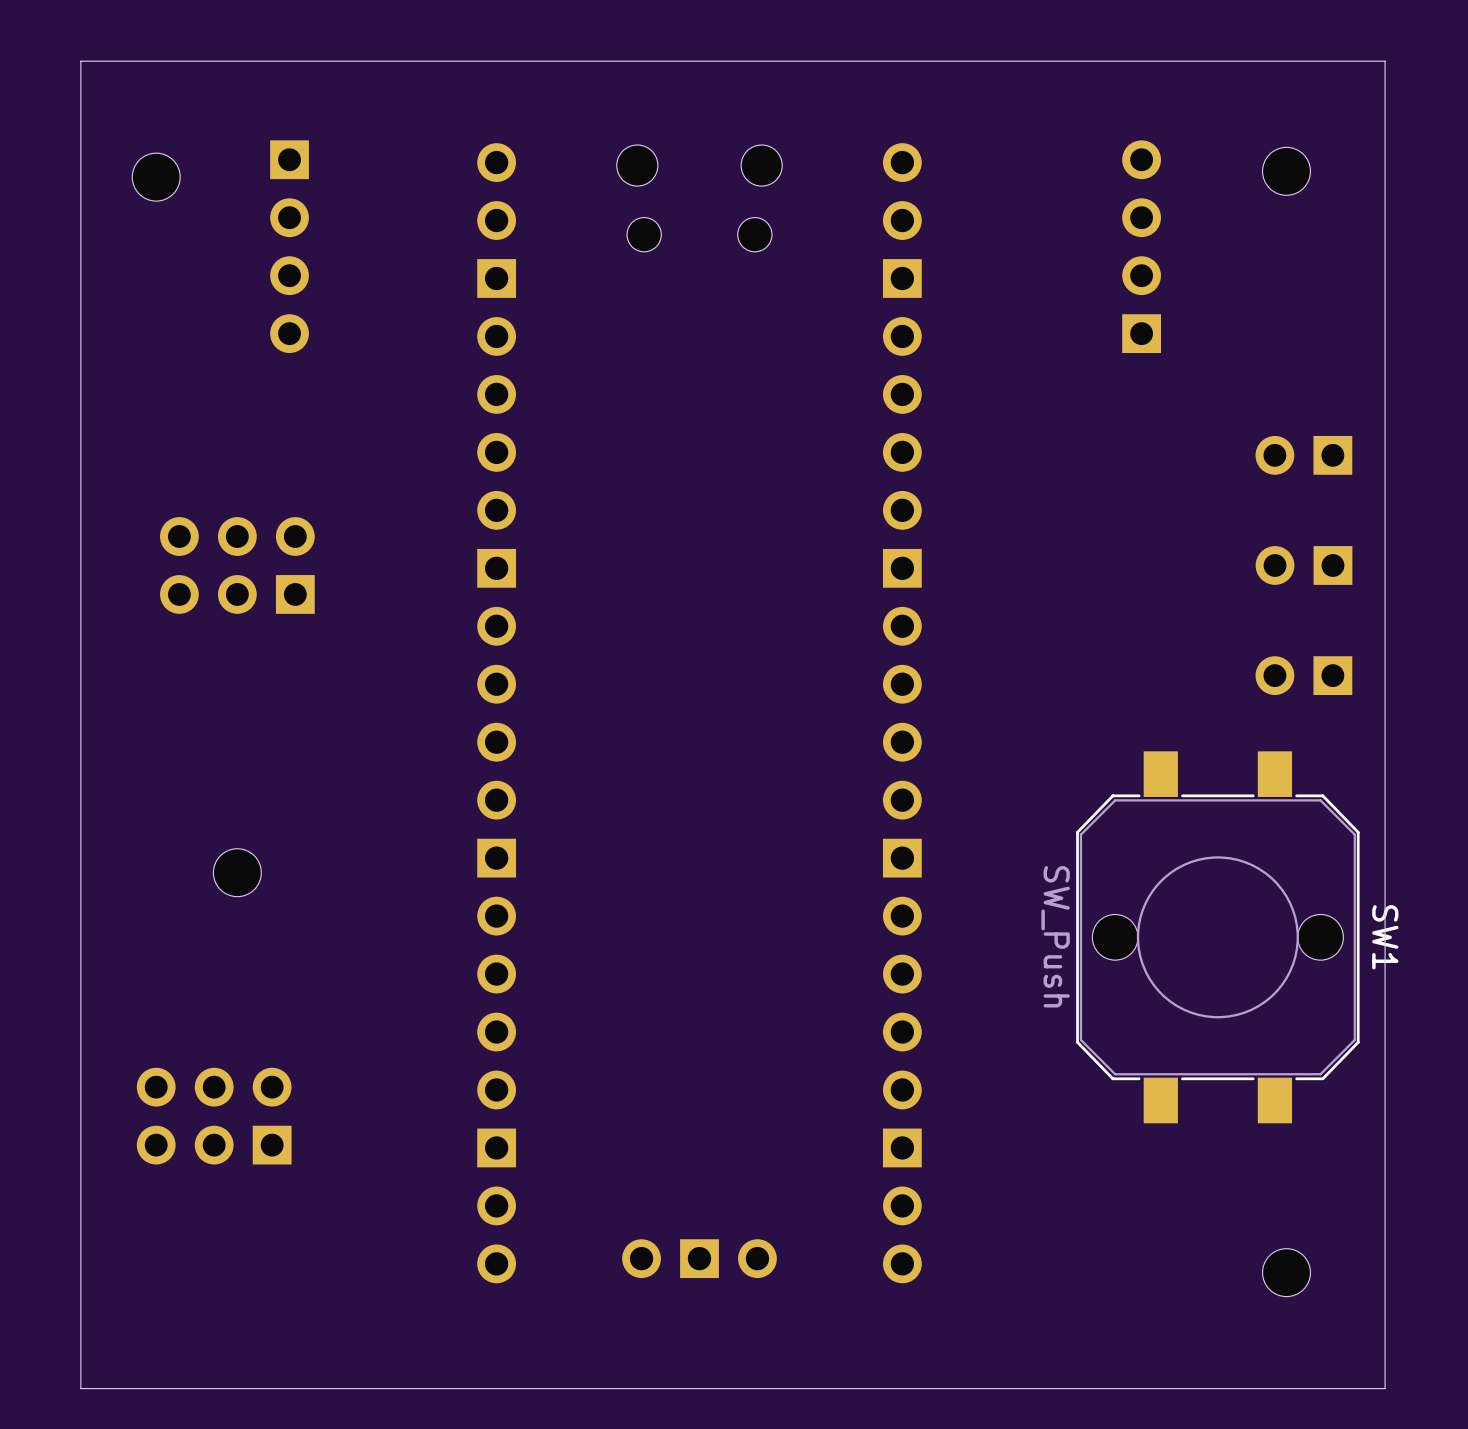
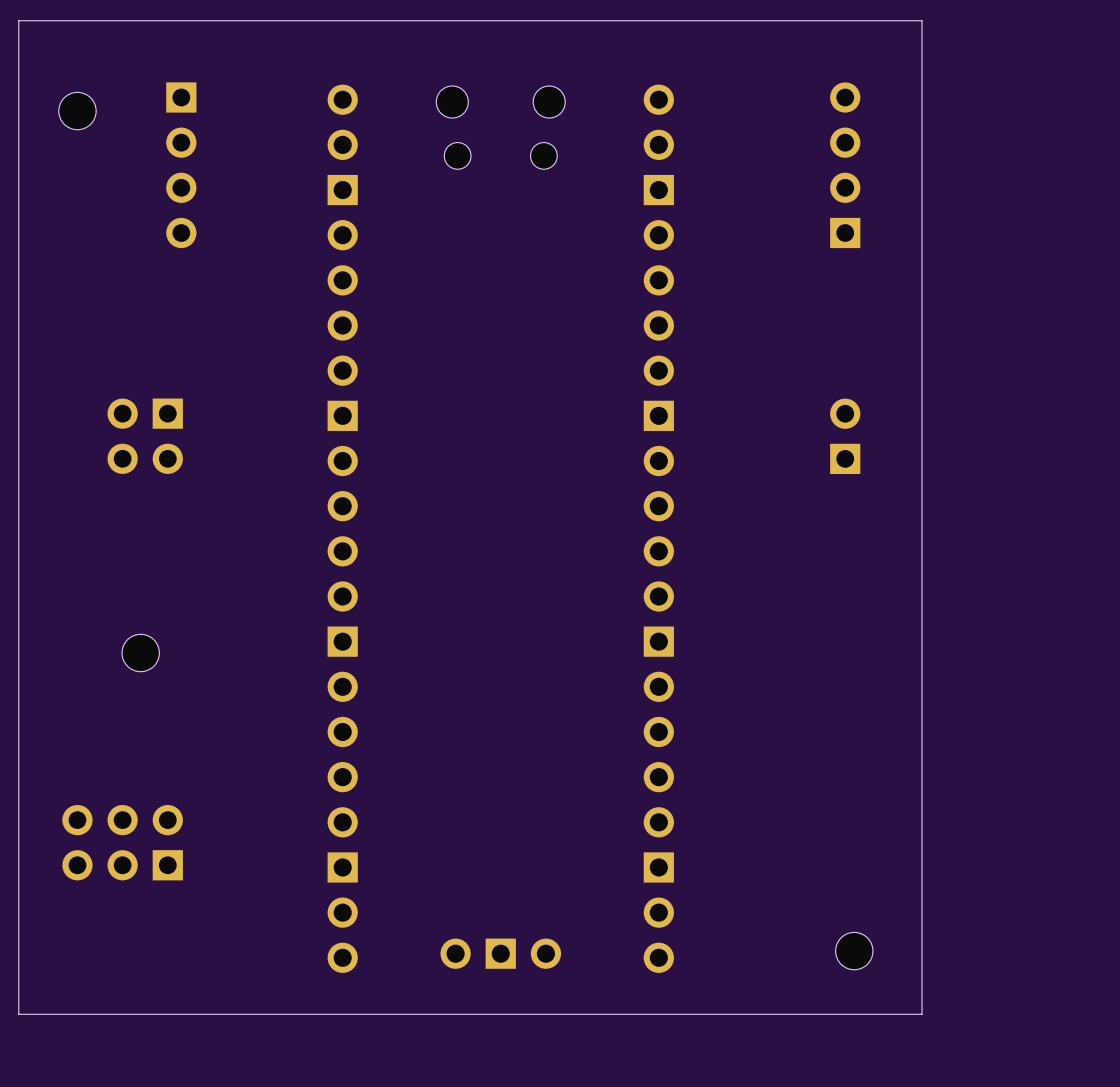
board edge: (1240, 61) (1385, 61) (1385, 1388) (80, 1388) (80, 1336) -> (922, 20) (922, 1014) (18, 1014)
part: (1286, 171) -> none
part: (1303, 455) -> none
part: (237, 565) -> none
part: (1304, 565) -> none
part: none -> (145, 436)
part: none -> (845, 436)
part: (1303, 675) -> none
SW1: SW_Push (1217, 937) -> none
part position: (1286, 1272) -> (854, 951)

